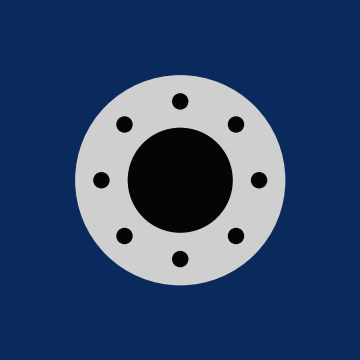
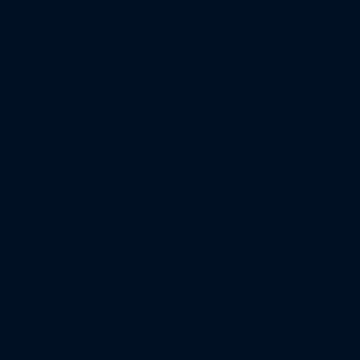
part: (180, 180) -> none

